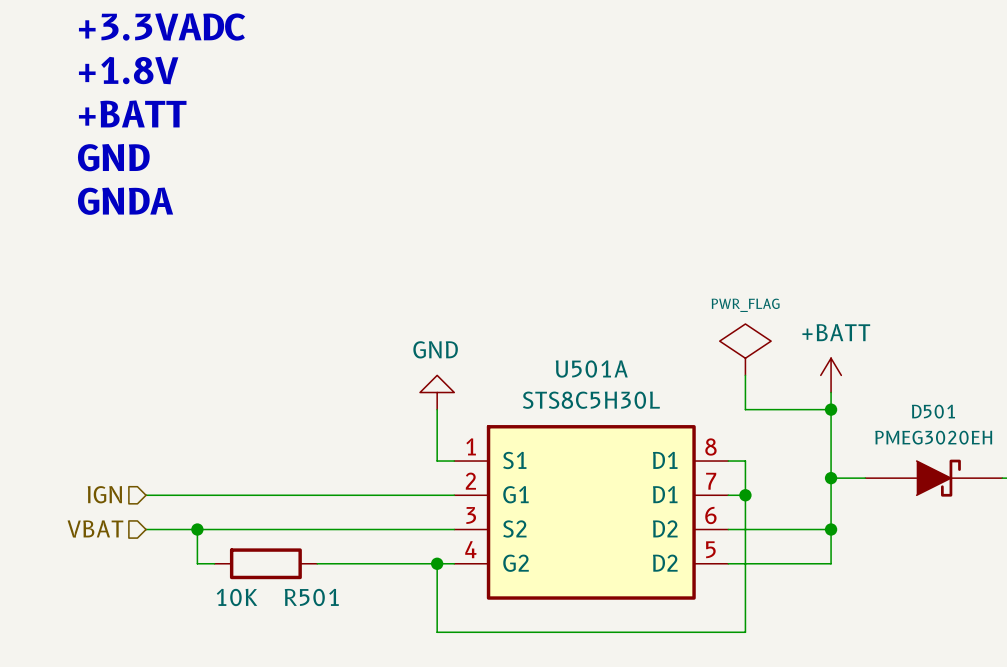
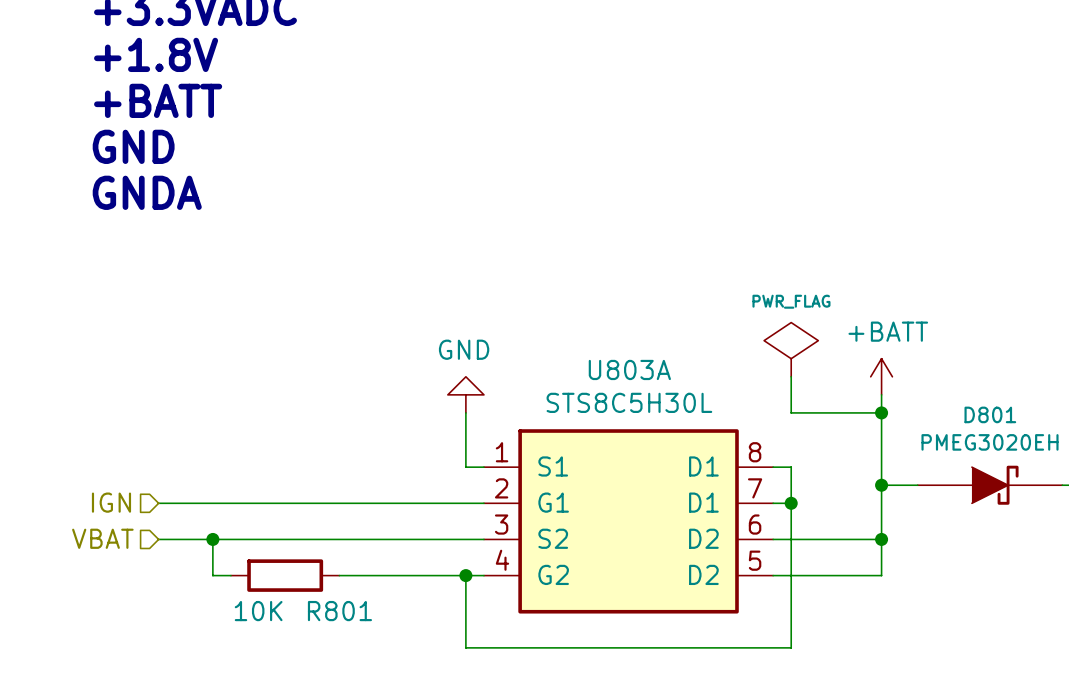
U501A name: U501A (591, 369) -> U803A (629, 369)
D501 name: D501 (933, 411) -> D801 (990, 414)
R501 name: R501 (311, 597) -> R801 (339, 611)

